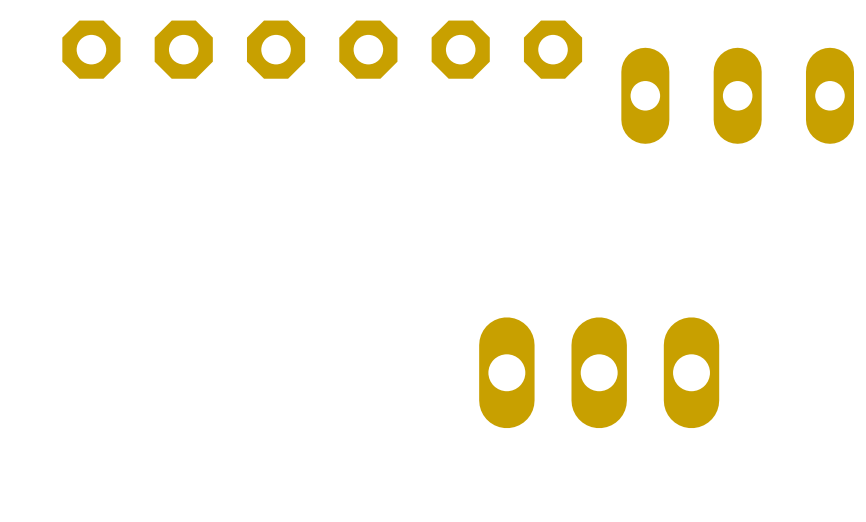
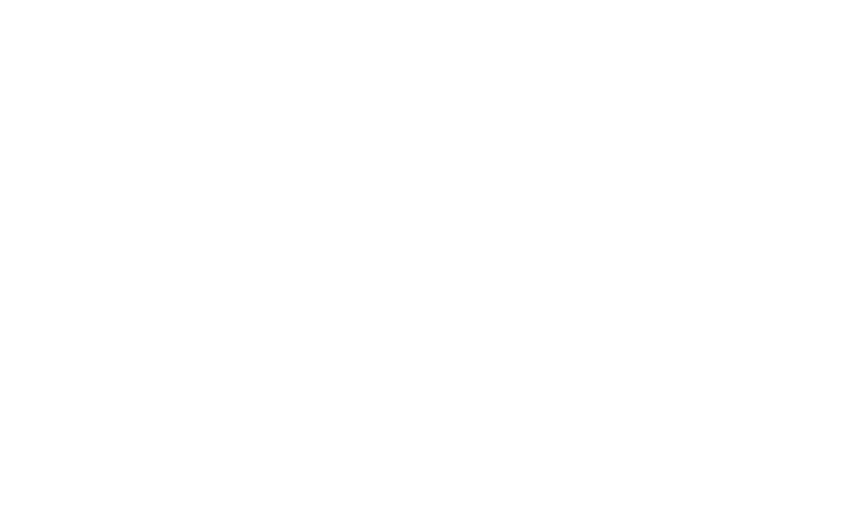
part: (137, 49) -> none
part: (322, 49) -> none
part: (506, 49) -> none
part: (737, 95) -> none
part: (599, 372) -> none

